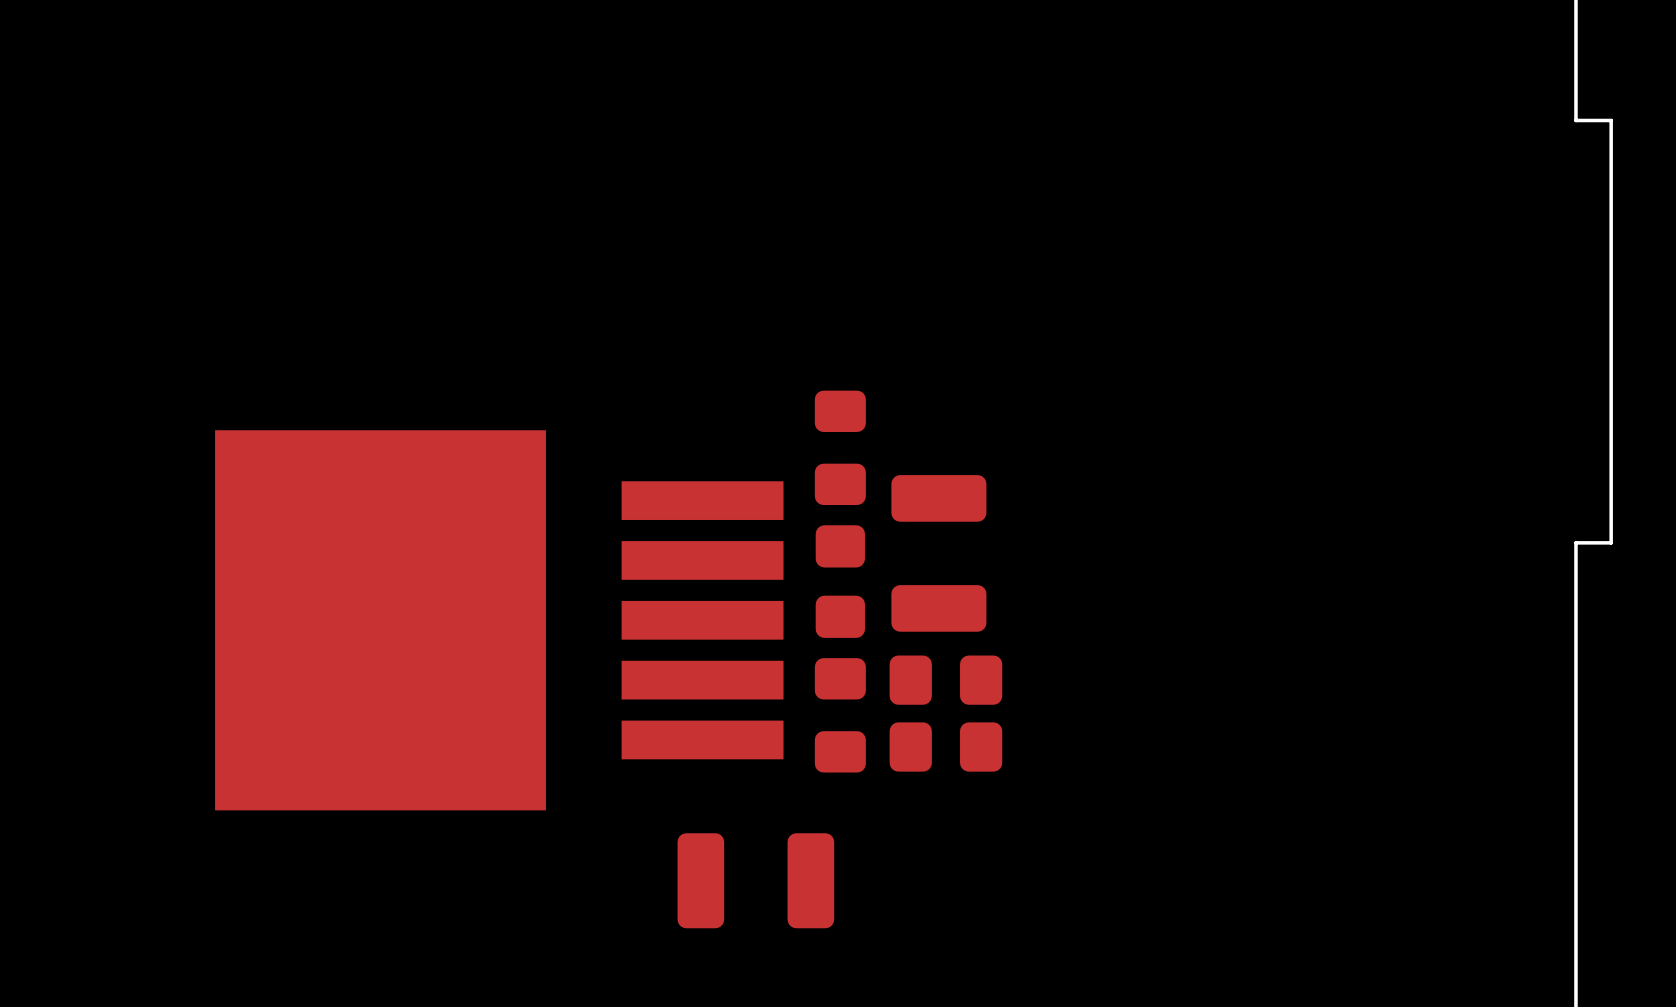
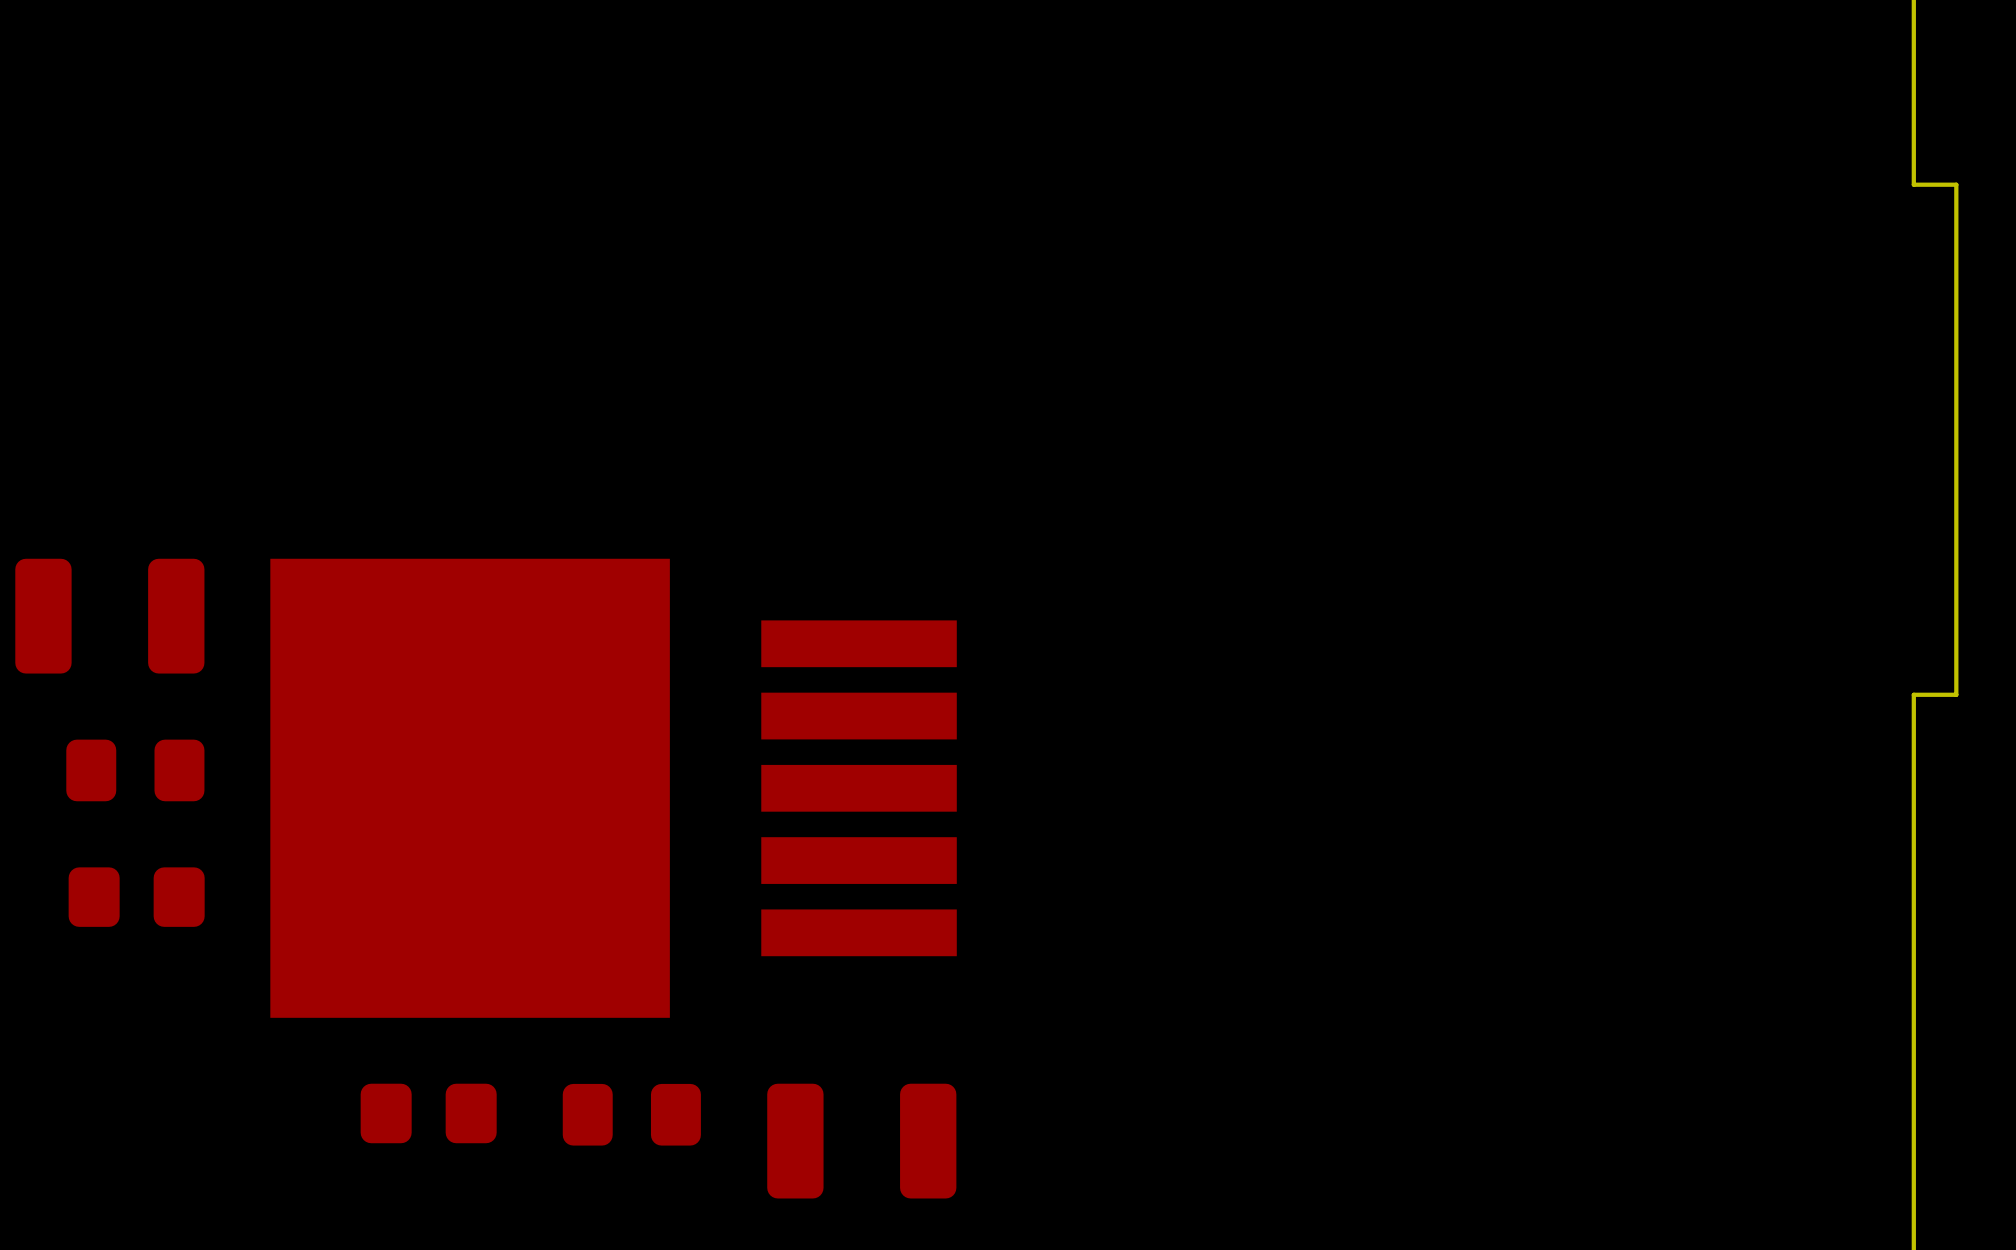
part: (840, 447) -> none
part: none -> (109, 616)
part: (938, 553) -> none
part: (840, 581) -> none
part: none -> (135, 770)
part: (945, 680) -> none
part: none -> (136, 897)
part: (840, 715) -> none
part: (945, 747) -> none
part position: (755, 880) -> (861, 1141)
part: none -> (428, 1113)
part: none -> (631, 1114)

